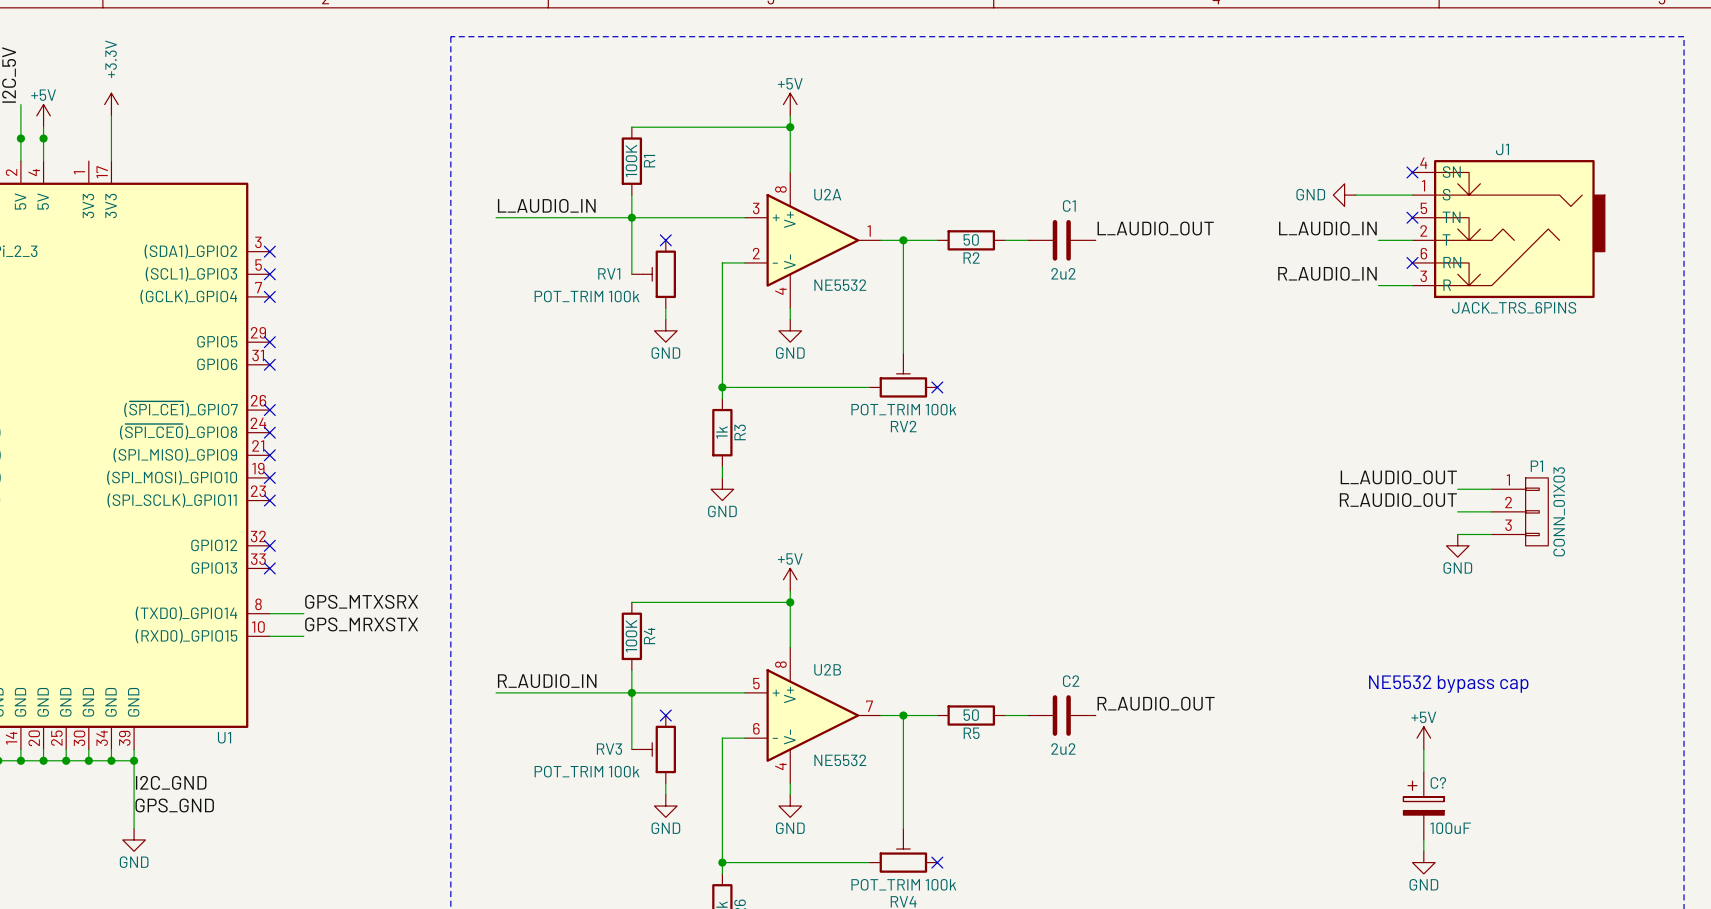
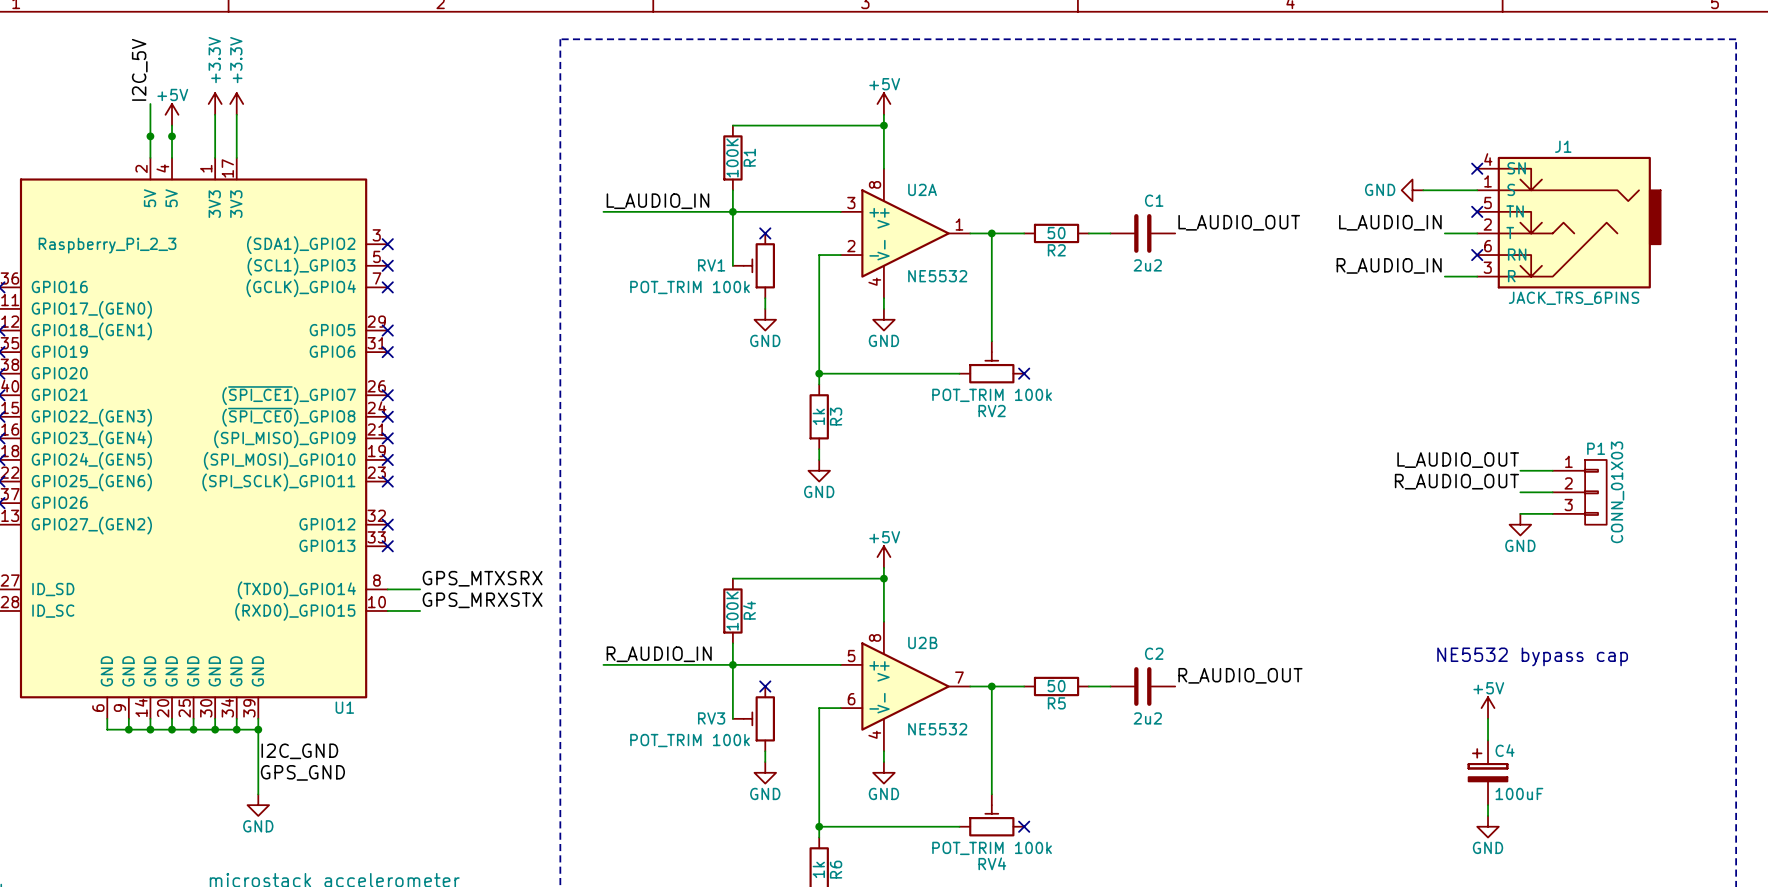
power symbol: none -> +3.3V (215, 104)
wire: none -> (215, 114) (215, 157)
C? name: C? (1438, 782) -> C4 (1505, 750)

